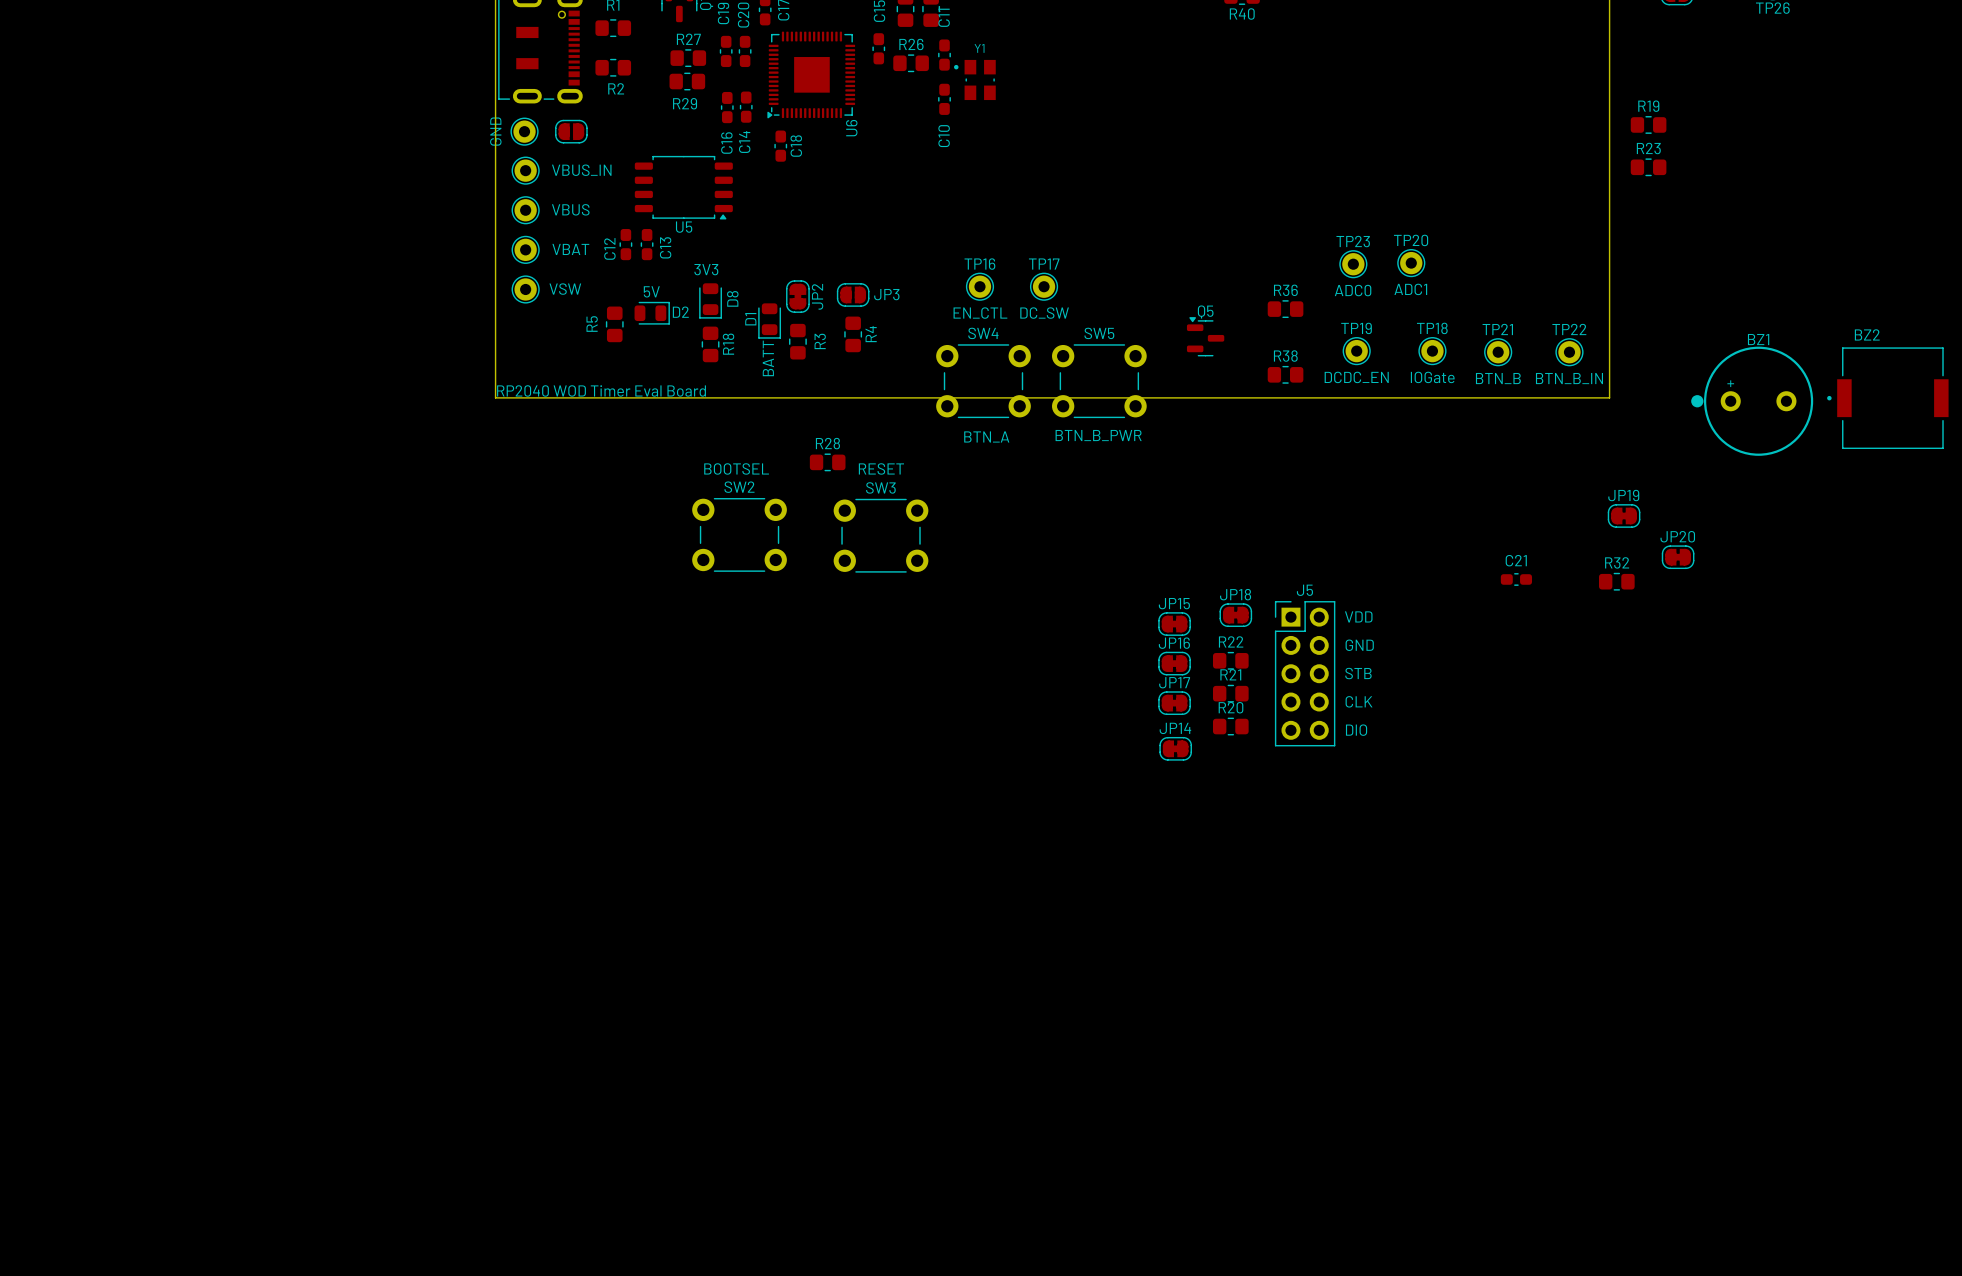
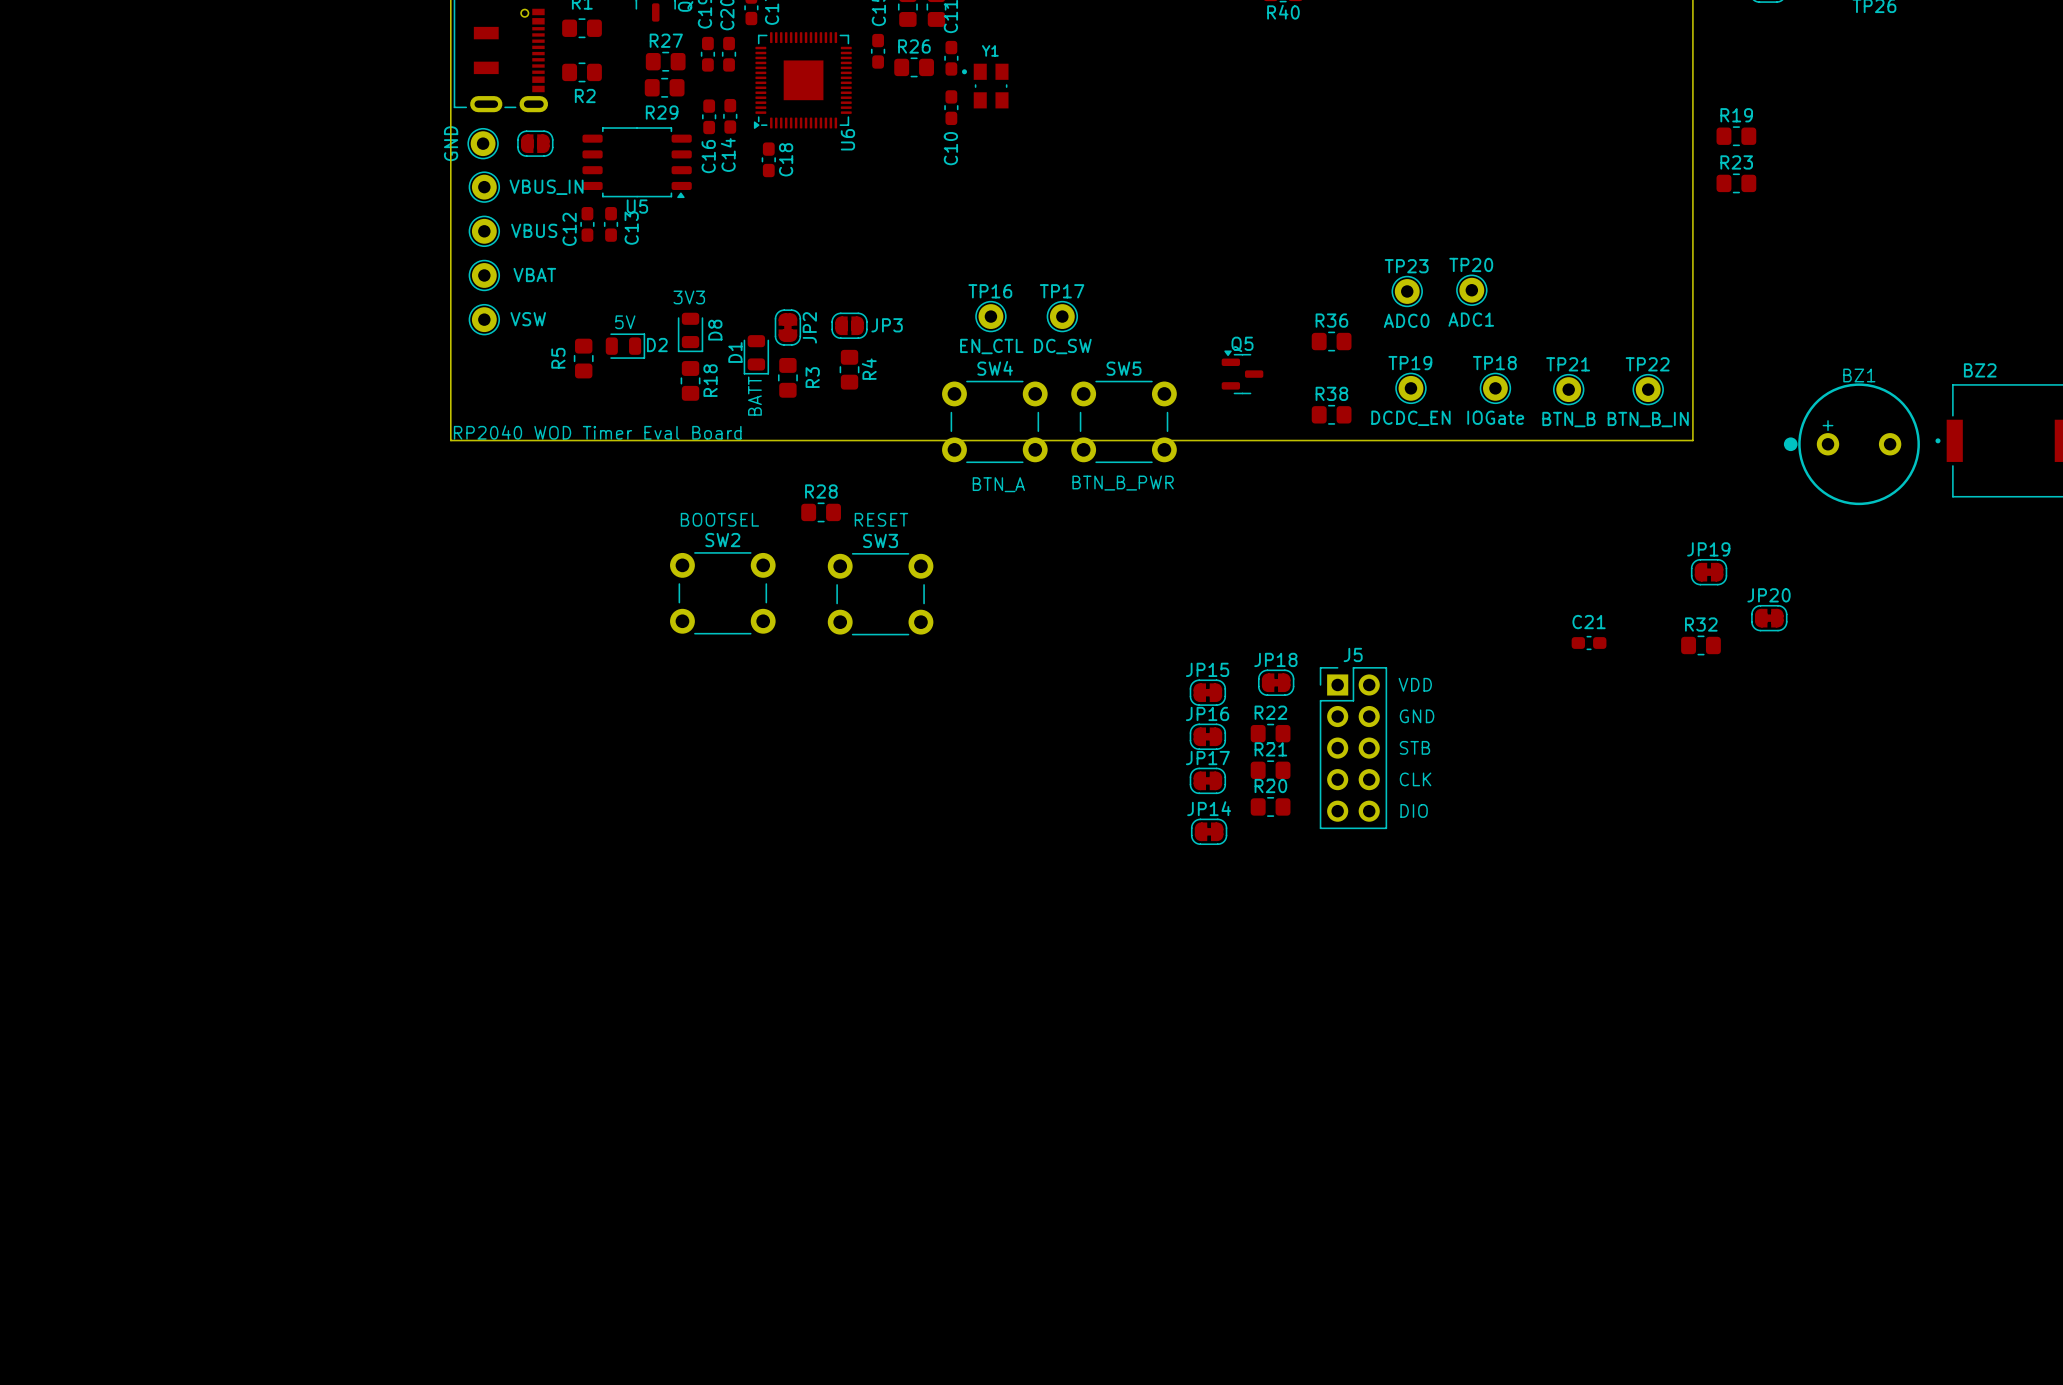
U5 position: (683, 187) -> (637, 162)
C12 position: (625, 244) -> (587, 224)
C13 position: (647, 244) -> (611, 224)

